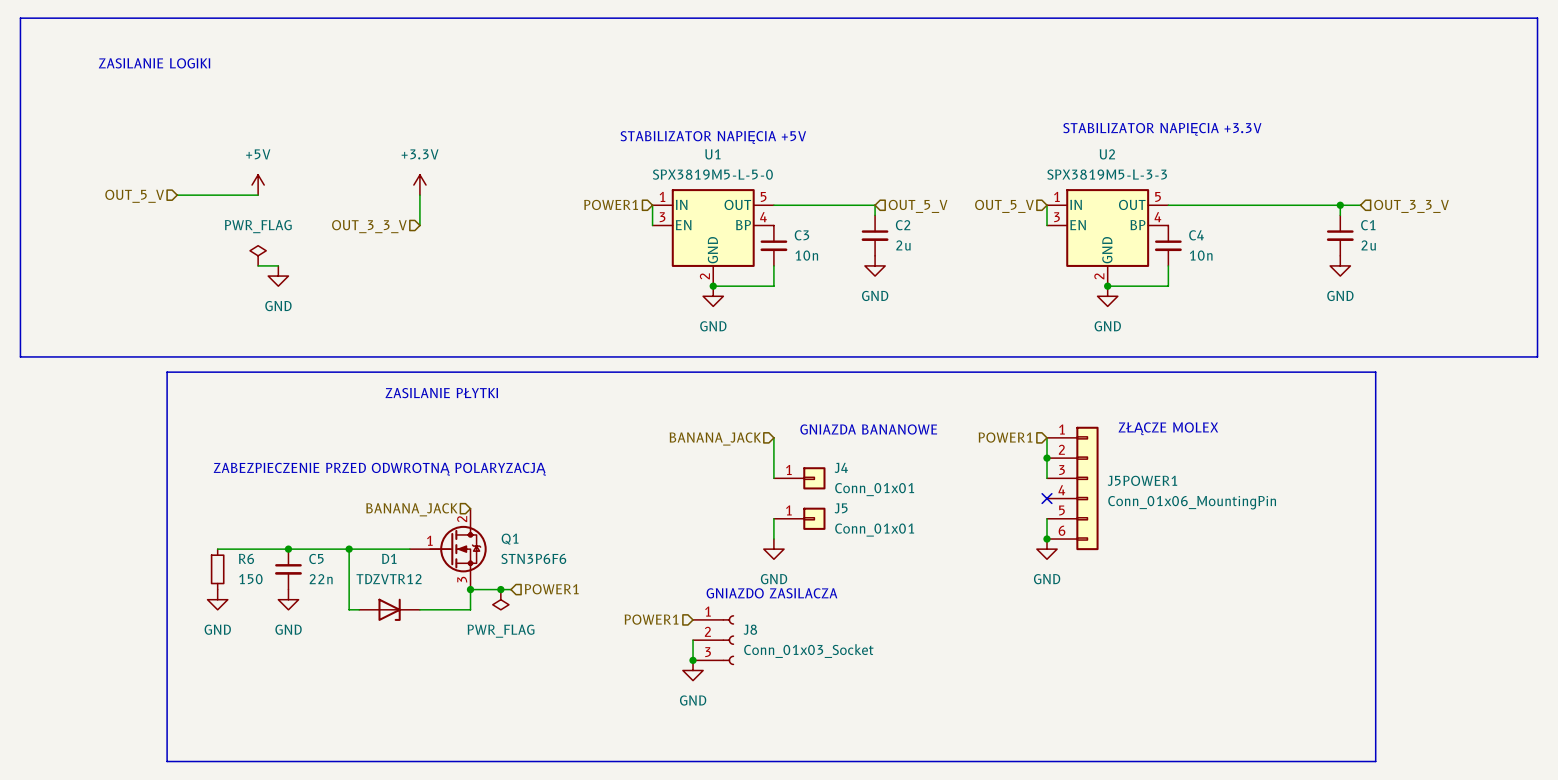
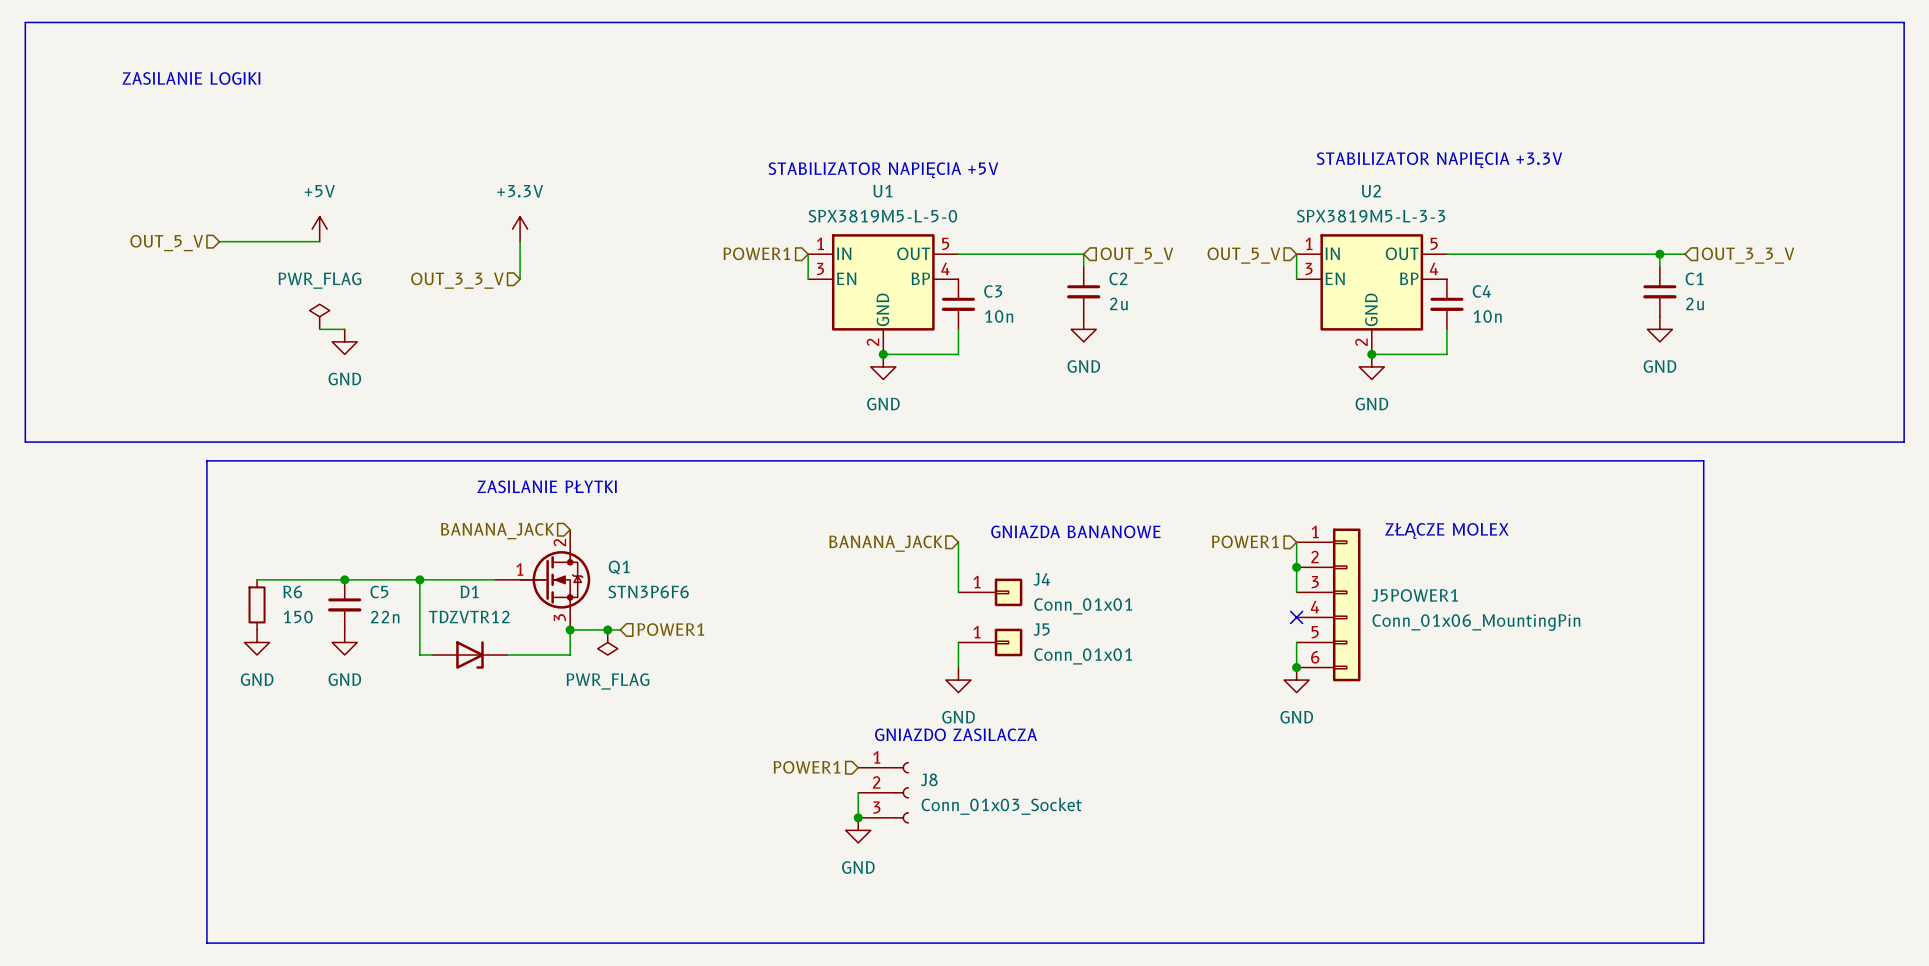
junction: none -> (344, 579)
junction: none -> (419, 579)
text: ZABEZPIECZENIE PRZED ODWROTNĄ POLARYZACJĄ (379, 469) -> none
junction: none -> (570, 629)
junction: none -> (607, 629)
hierarchical label position: BANANA_JACK (411, 509) -> BANANA_JACK (497, 531)
power symbol: none -> GND (257, 642)
power symbol: none -> GND (344, 642)
wire: (217, 549) (409, 549) -> (257, 579) (495, 579)
junction: (288, 549) -> none
wire: (349, 549) (349, 609) (359, 609) -> (419, 579) (419, 655) (432, 655)
junction: (349, 549) -> none
Q1 position: (448, 549) -> (542, 579)
R6 position: (217, 569) -> (257, 604)
C5 position: (288, 569) -> (344, 604)
junction: (470, 589) -> none
junction: (500, 589) -> none
wire: (510, 589) (470, 589) (470, 609) (419, 609) -> (620, 629) (570, 629) (570, 655) (507, 655)
hierarchical label position: POWER1 (551, 589) -> POWER1 (670, 629)
power symbol: GND (217, 599) -> none
power symbol: GND (288, 599) -> none
power symbol position: PWR_FLAG (500, 599) -> PWR_FLAG (607, 642)
D1 position: (389, 609) -> (469, 655)

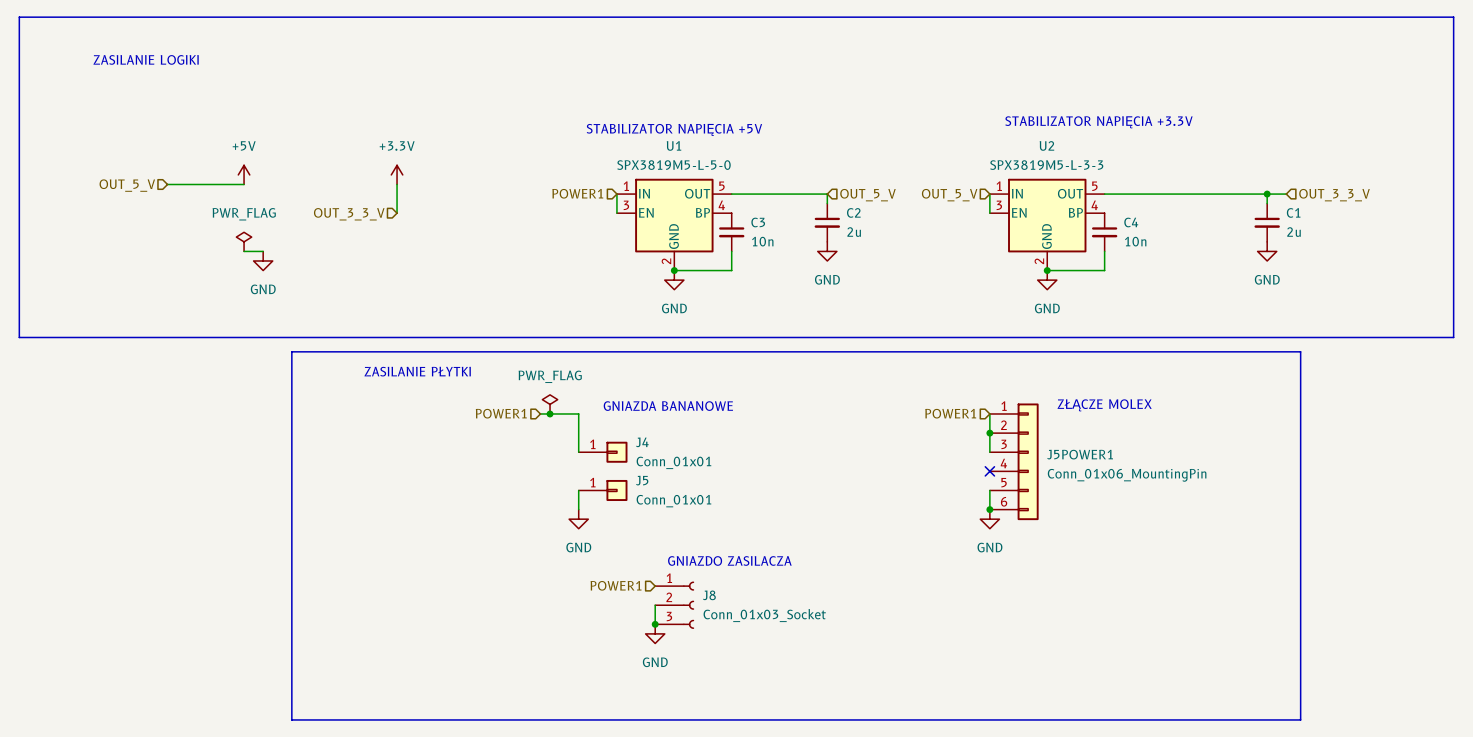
line: (382, 460) (206, 460) (206, 943) (382, 943) -> (291, 351) (291, 719)
hierarchical label: BANANA_JACK (497, 531) -> none
text position: GNIAZDA BANANOWE (1075, 531) -> GNIAZDA BANANOWE (668, 406)
wire: none -> (540, 413) (578, 413) (578, 452)
junction: none -> (550, 413)
wire: (958, 542) (958, 592) -> none
hierarchical label: BANANA_JACK (885, 543) -> none
wire: (257, 579) (495, 579) -> none
junction: (344, 579) -> none
wire: (419, 579) (419, 655) (432, 655) -> none
junction: (419, 579) -> none
Q1: STN3P6F6 (542, 579) -> none
J4 position: (990, 592) -> (603, 452)
R6: 150 (257, 604) -> none
C5: 22n (344, 604) -> none
junction: (570, 629) -> none
junction: (607, 629) -> none
wire: (620, 629) (570, 629) (570, 655) (507, 655) -> none
hierarchical label rotation: 0° (670, 629) -> 180° (501, 413)
hierarchical label position: POWER1 (670, 629) -> POWER1 (501, 413)
power symbol: GND (257, 642) -> none
power symbol: GND (344, 642) -> none
power symbol rotation: 0° (607, 642) -> 180° (550, 404)
power symbol position: PWR_FLAG (607, 642) -> PWR_FLAG (550, 404)
wire: (958, 642) (958, 667) -> (578, 490) (578, 509)
J5 position: (990, 642) -> (603, 490)
D1: TDZVTR12 (469, 655) -> none
power symbol position: GND (958, 680) -> GND (578, 519)

